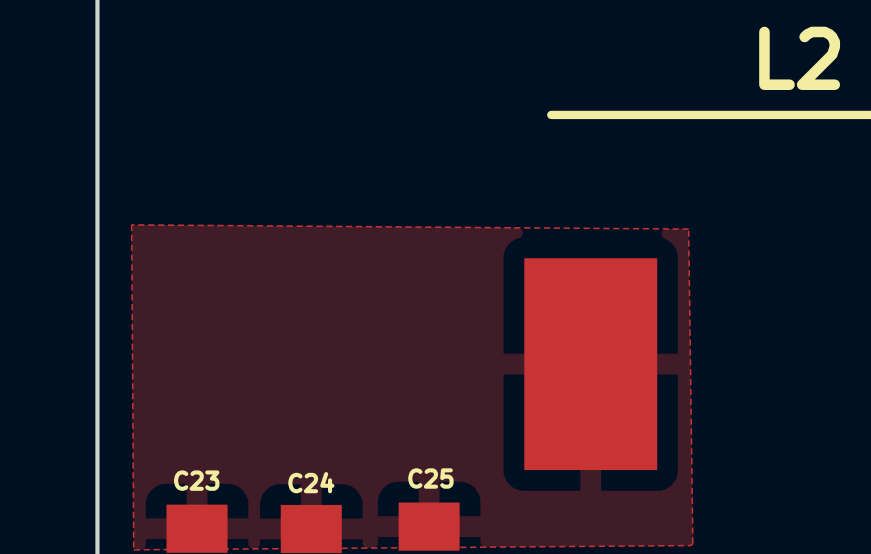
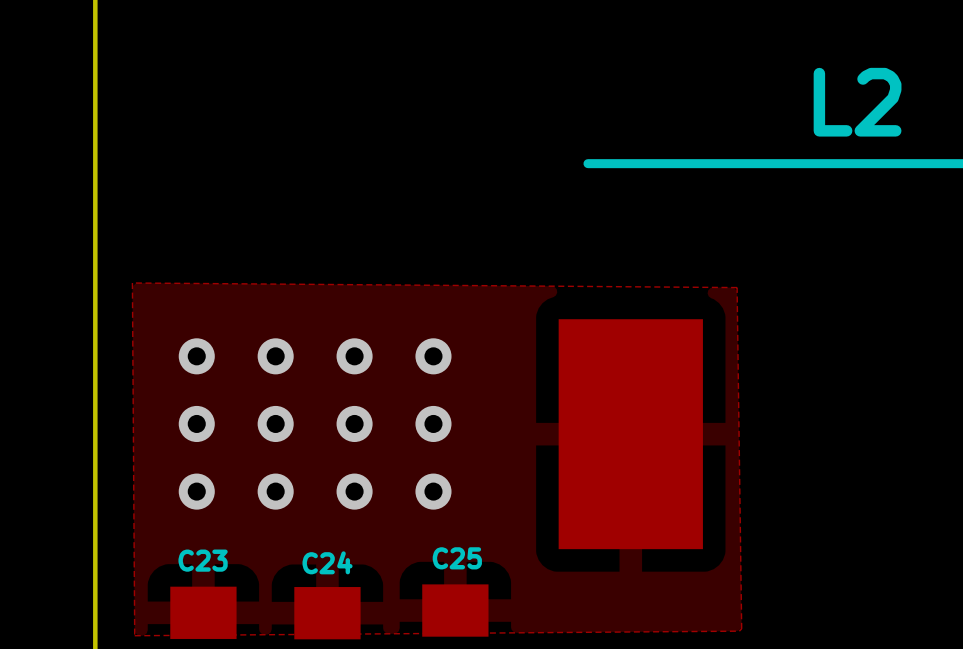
via: none -> (196, 356)
via: none -> (275, 356)
via: none -> (354, 356)
via: none -> (433, 356)
via: none -> (196, 423)
via: none -> (275, 423)
via: none -> (354, 423)
via: none -> (433, 423)
via: none -> (196, 491)
via: none -> (275, 491)
via: none -> (354, 491)
via: none -> (433, 491)

